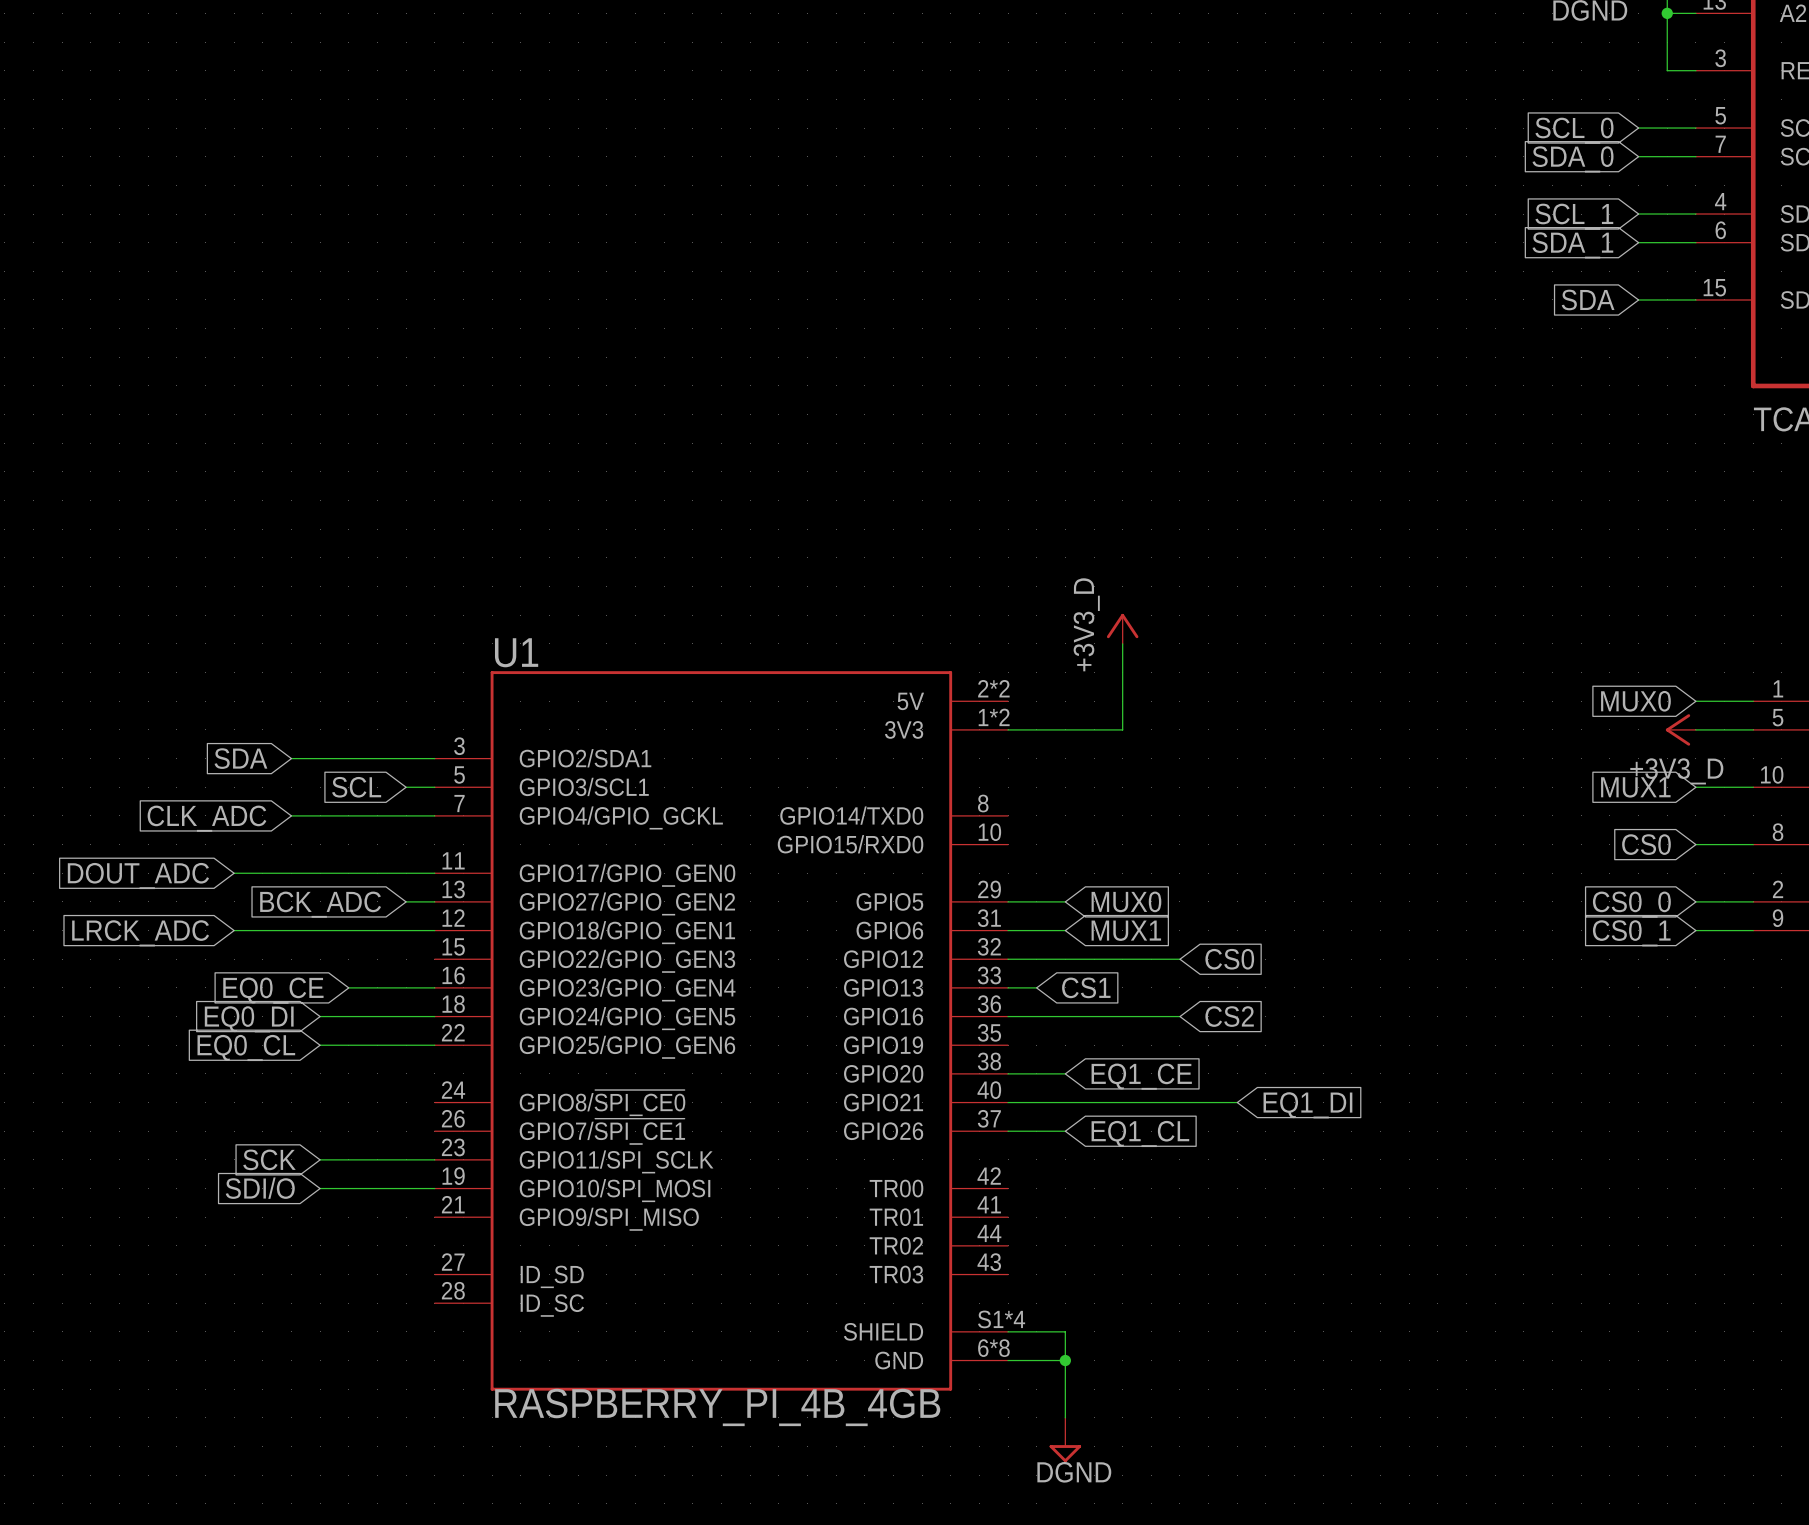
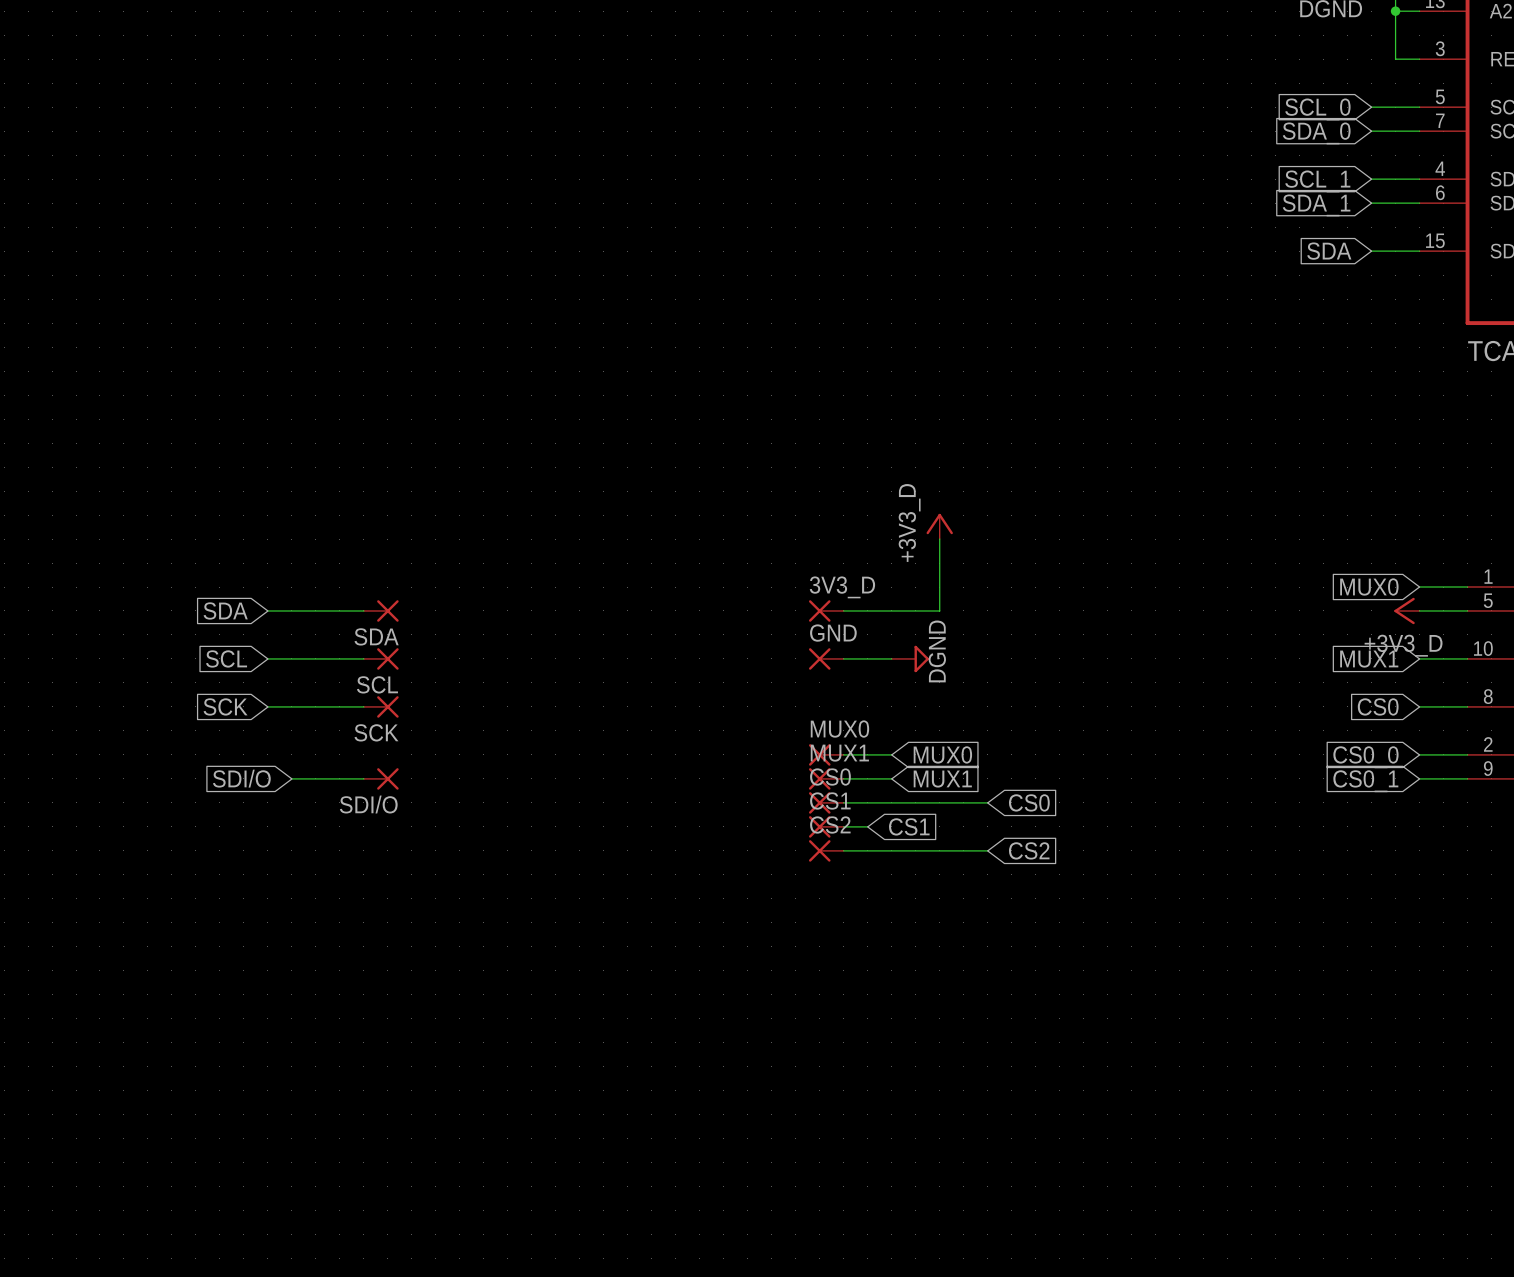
wire: none -> (267, 610) (363, 610)
SDA: none -> (381, 610)
3V3_D: none -> (826, 610)
global label position: SDA (240, 758) -> SDA (225, 610)
wire: (291, 758) (434, 758) -> none
global label position: SCL (356, 787) -> SCL (226, 658)
SCL: none -> (381, 658)
GND: none -> (826, 658)
wire: none -> (843, 658) (891, 658)
power symbol: none -> DGND (910, 658)
wire: (291, 815) (434, 815) -> none
global label: CLK_ADC (206, 818) -> none
global label: none -> SCK (225, 706)
SCK: none -> (381, 706)
wire: (234, 873) (434, 873) -> none
global label: DOUT_ADC (138, 876) -> none
wire: (406, 901) (434, 901) -> none
MUX0: none -> (826, 754)
global label: BCK_ADC (320, 904) -> none
wire: (234, 930) (348, 930) -> (267, 706) (363, 706)
SDI/O: none -> (381, 778)
MUX1: none -> (826, 778)
global label: LRCK_ADC (140, 933) -> none
CS0: none -> (826, 802)
wire: (348, 987) (434, 987) -> (267, 658) (339, 658)
CS1: none -> (826, 826)
global label: EQ0_CE (273, 990) -> none
wire: (320, 1016) (434, 1016) -> none
CS2: none -> (826, 850)
global label: EQ0_DI (249, 1019) -> none
U1: RASPBERRY_PI_4B_4GB (721, 1030) -> none
wire: (320, 1045) (434, 1045) -> none
global label: EQ0_CL (246, 1047) -> none
wire: (1008, 1073) (1065, 1073) -> none
global label: EQ1_CE (1141, 1076) -> none
wire: (1008, 1102) (1237, 1102) -> none
global label: EQ1_DI (1307, 1105) -> none
wire: (1008, 1131) (1065, 1131) -> none
global label: EQ1_CL (1140, 1133) -> none
global label: SCK (269, 1159) -> none
wire: (320, 1159) (434, 1159) -> none
global label position: SDI/O (260, 1188) -> SDI/O (241, 778)
wire: (320, 1188) (434, 1188) -> none
wire: (1008, 1331) (1065, 1331) (1065, 1417) -> none
wire: (1008, 1360) (1065, 1360) -> none
junction: (1065, 1360) -> none
power symbol: DGND (1065, 1440) -> none

